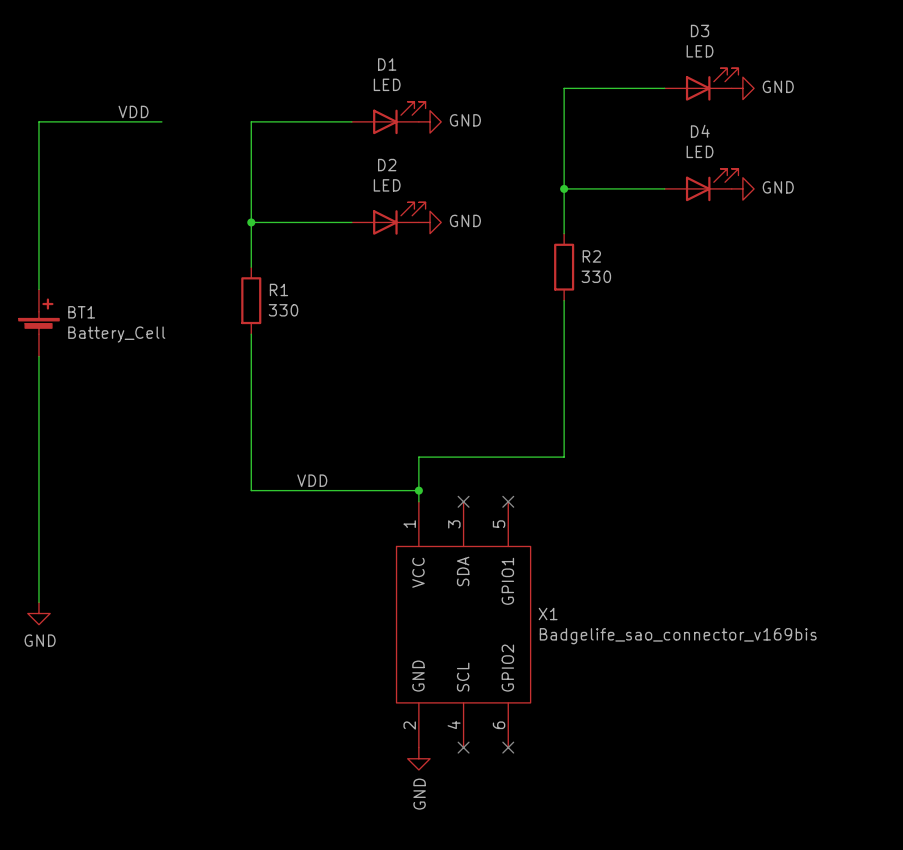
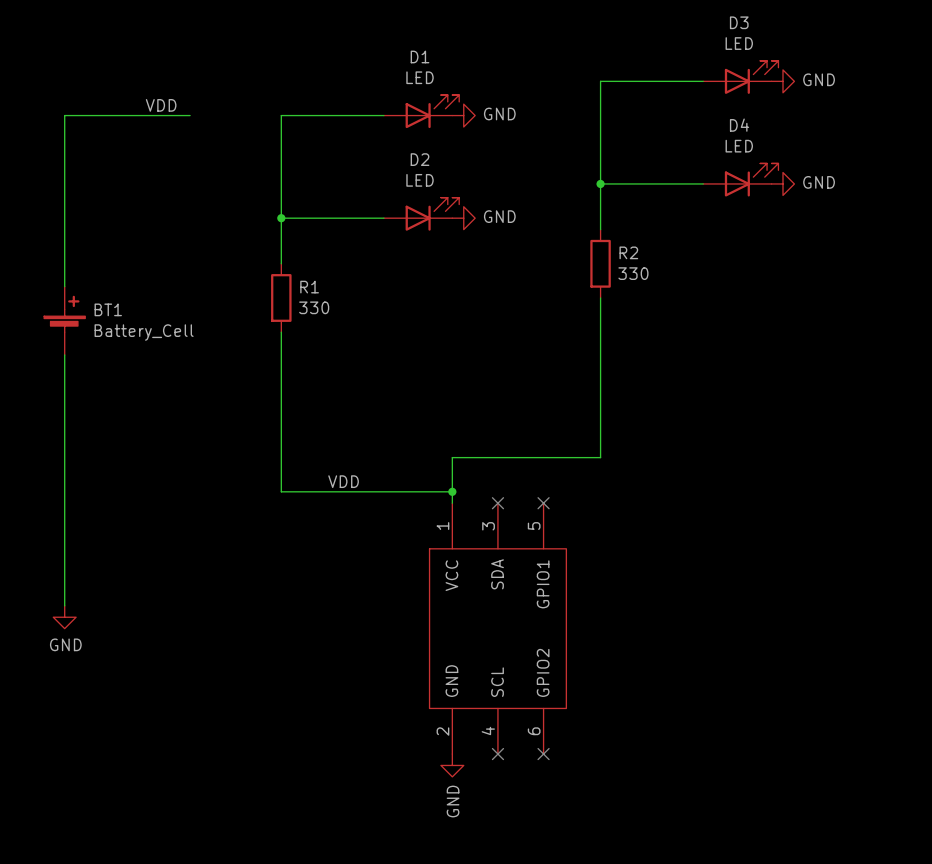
X1 name: X1 (548, 613) -> none
X1 value: Badgelife_sao_connector_v169bis (678, 636) -> none

